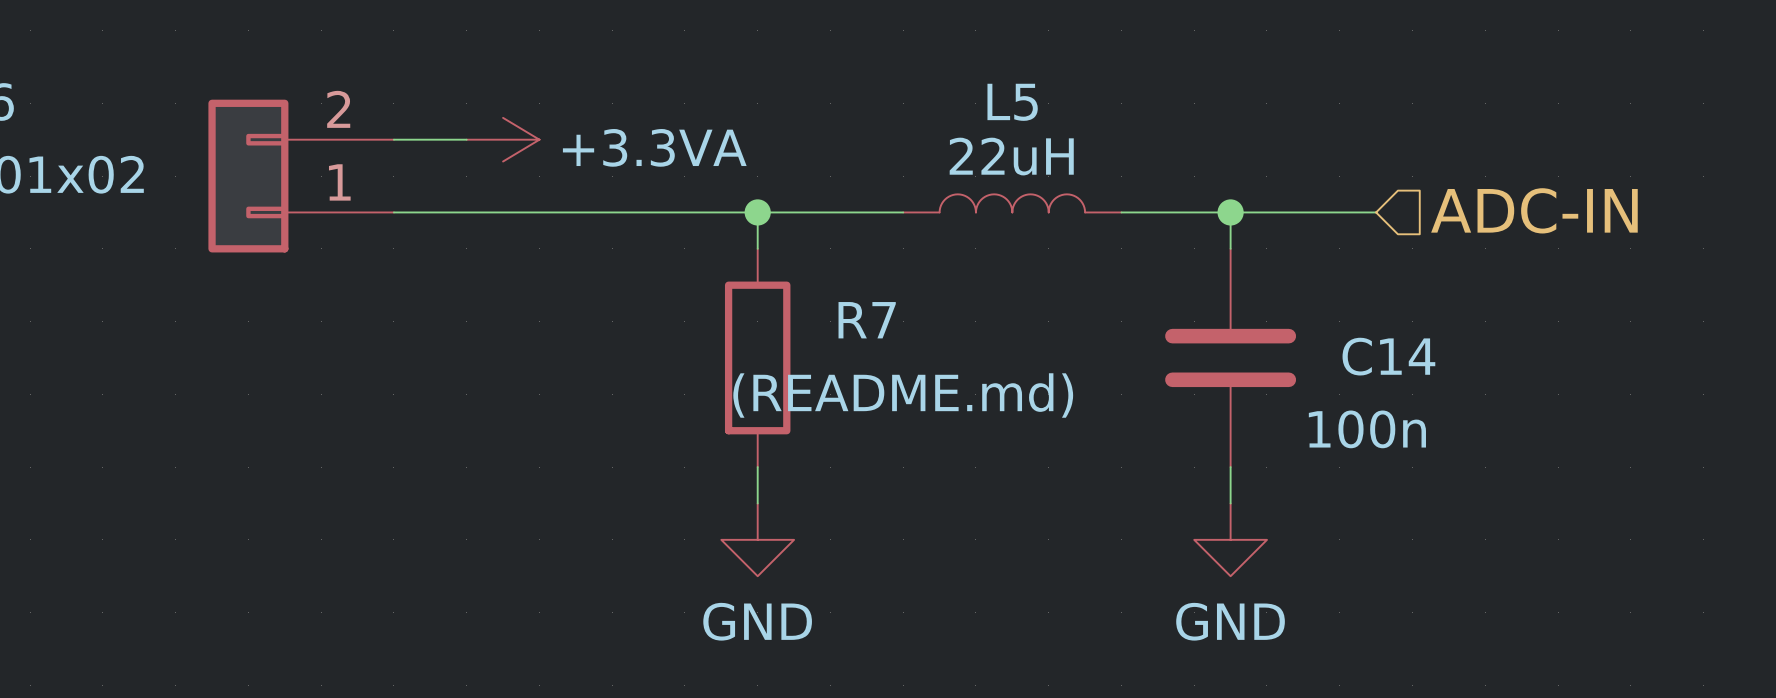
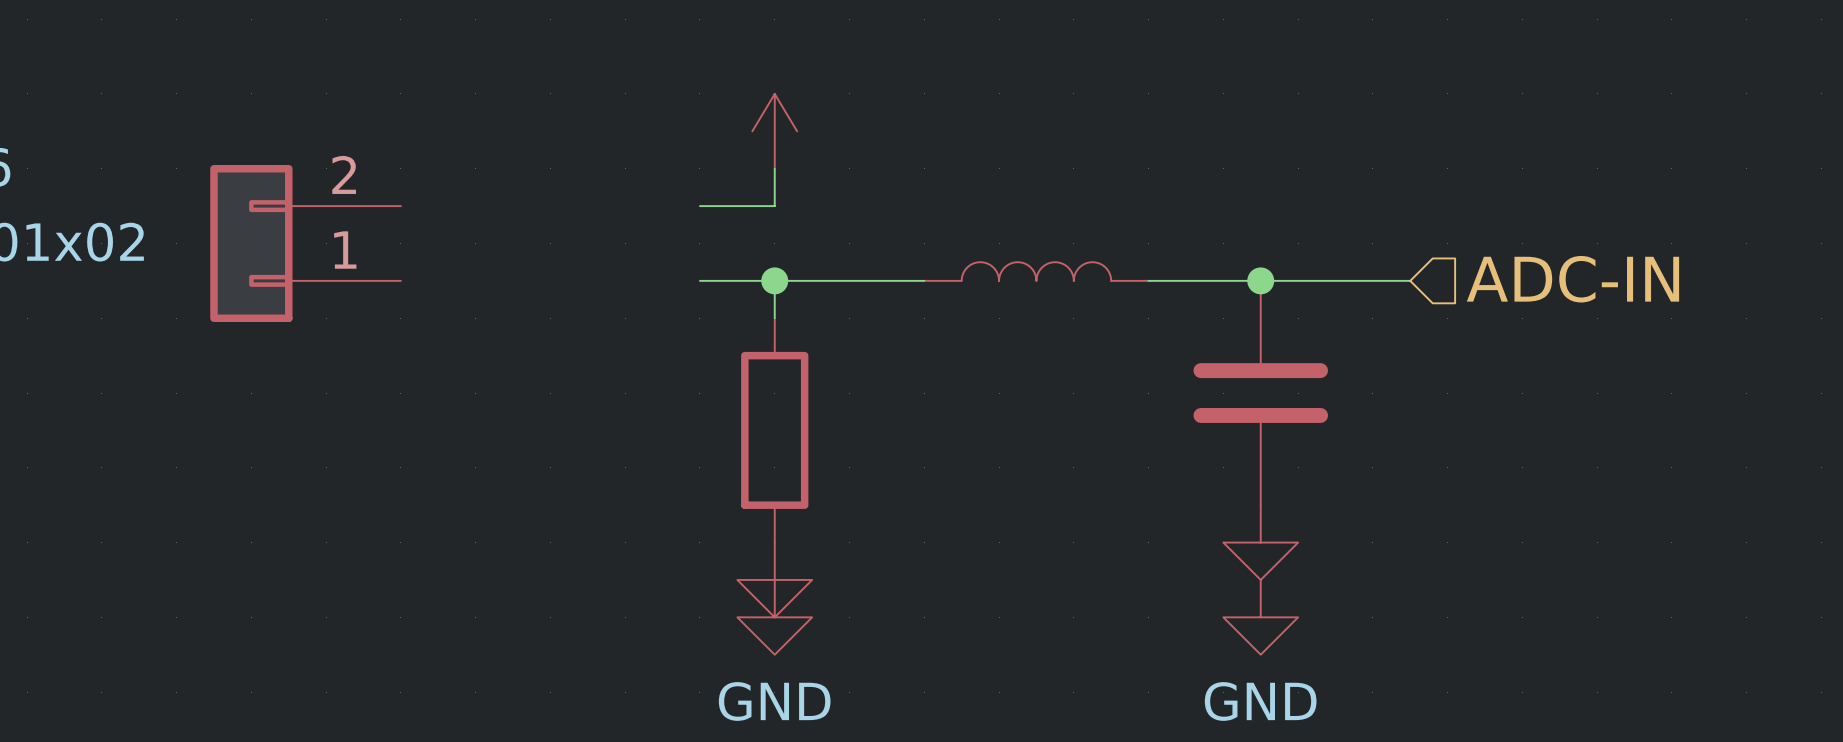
power symbol: none -> (774, 131)
wire: none -> (774, 168) (774, 206) (699, 206)
wire: (393, 139) (466, 139) -> none
power symbol: +3.3VA (503, 139) -> none
L5: 22uH (1012, 203) -> none
wire: (393, 212) (684, 212) -> none
R7 name: R7 (867, 320) -> none
part: none -> (1260, 393)
C14: 100n (1230, 357) -> none
R7 value: (README.md) (903, 395) -> none
wire: (1230, 467) (1230, 503) -> none
power symbol: none -> (1260, 542)
power symbol: none -> (774, 579)

